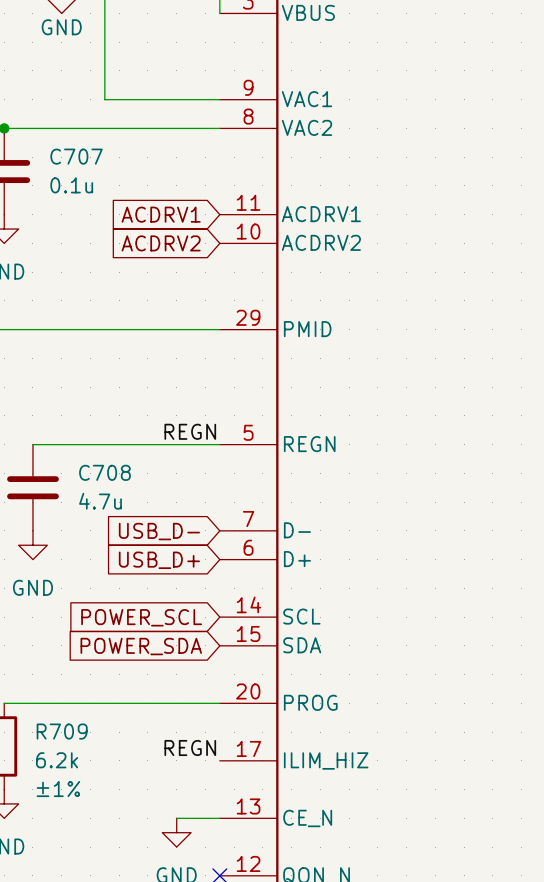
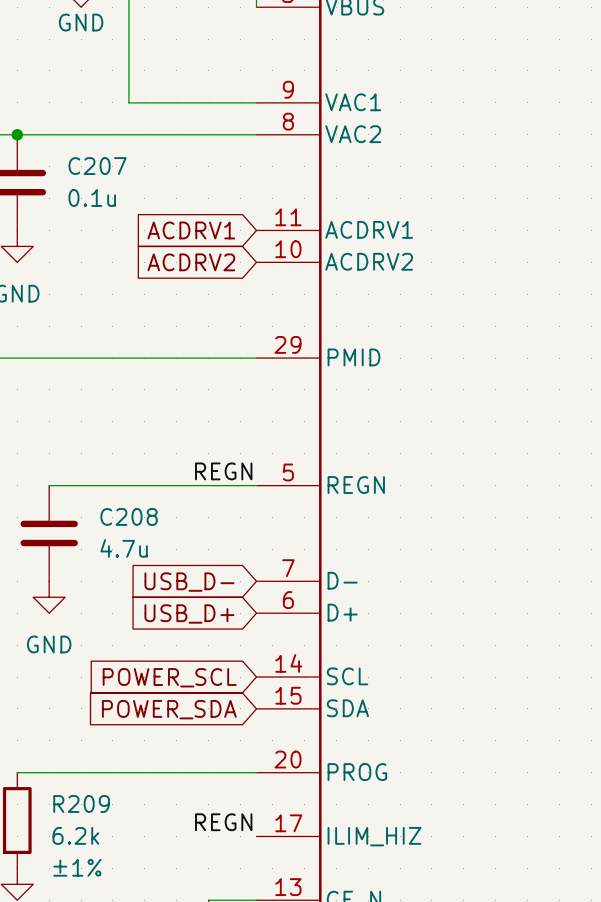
C707 name: C707 (76, 156) -> C207 (97, 166)
C708 name: C708 (104, 472) -> C208 (129, 516)
R709 name: R709 (62, 731) -> R209 (81, 803)

